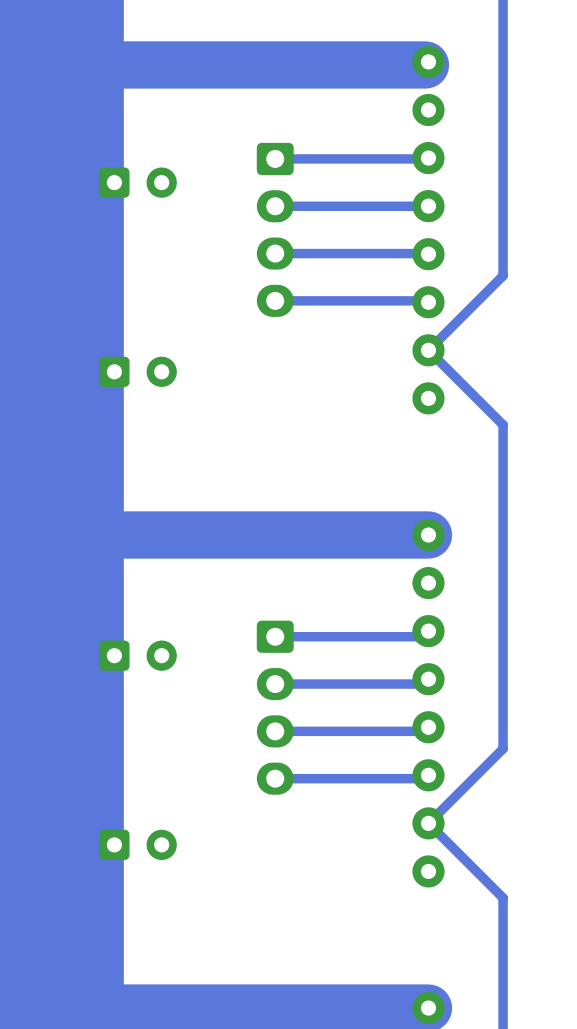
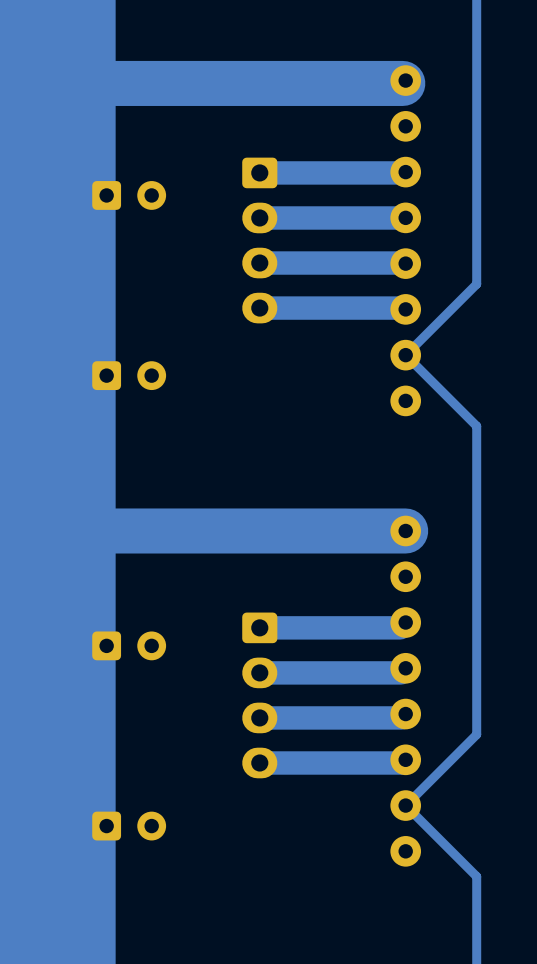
track width: thin (418, 158) (275, 158) -> thick (395, 172) (259, 172)
track width: thin (418, 206) (275, 206) -> thick (396, 217) (259, 217)
track width: thin (419, 253) (275, 253) -> thick (397, 263) (259, 263)
track width: thin (420, 300) (275, 300) -> thick (398, 308) (259, 308)
track width: thin (422, 636) (275, 636) -> thick (400, 627) (259, 627)
track width: thin (423, 684) (275, 684) -> thick (401, 672) (259, 672)
track width: thin (424, 731) (275, 731) -> thick (401, 717) (259, 717)
track width: thin (425, 778) (275, 778) -> thick (402, 762) (259, 762)

